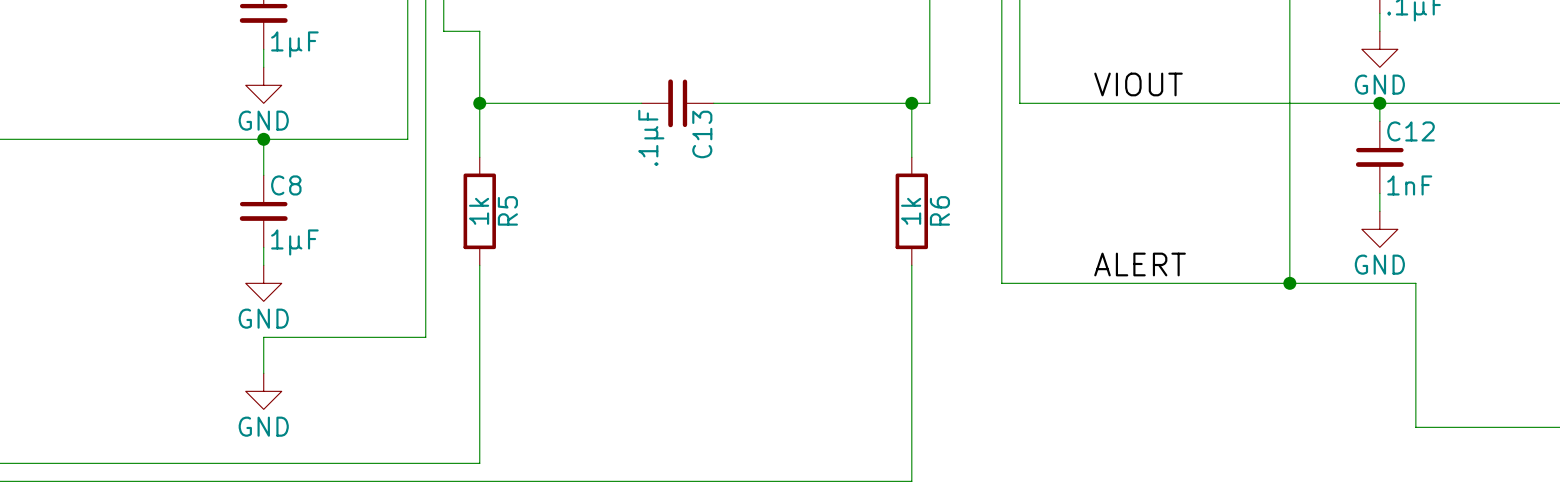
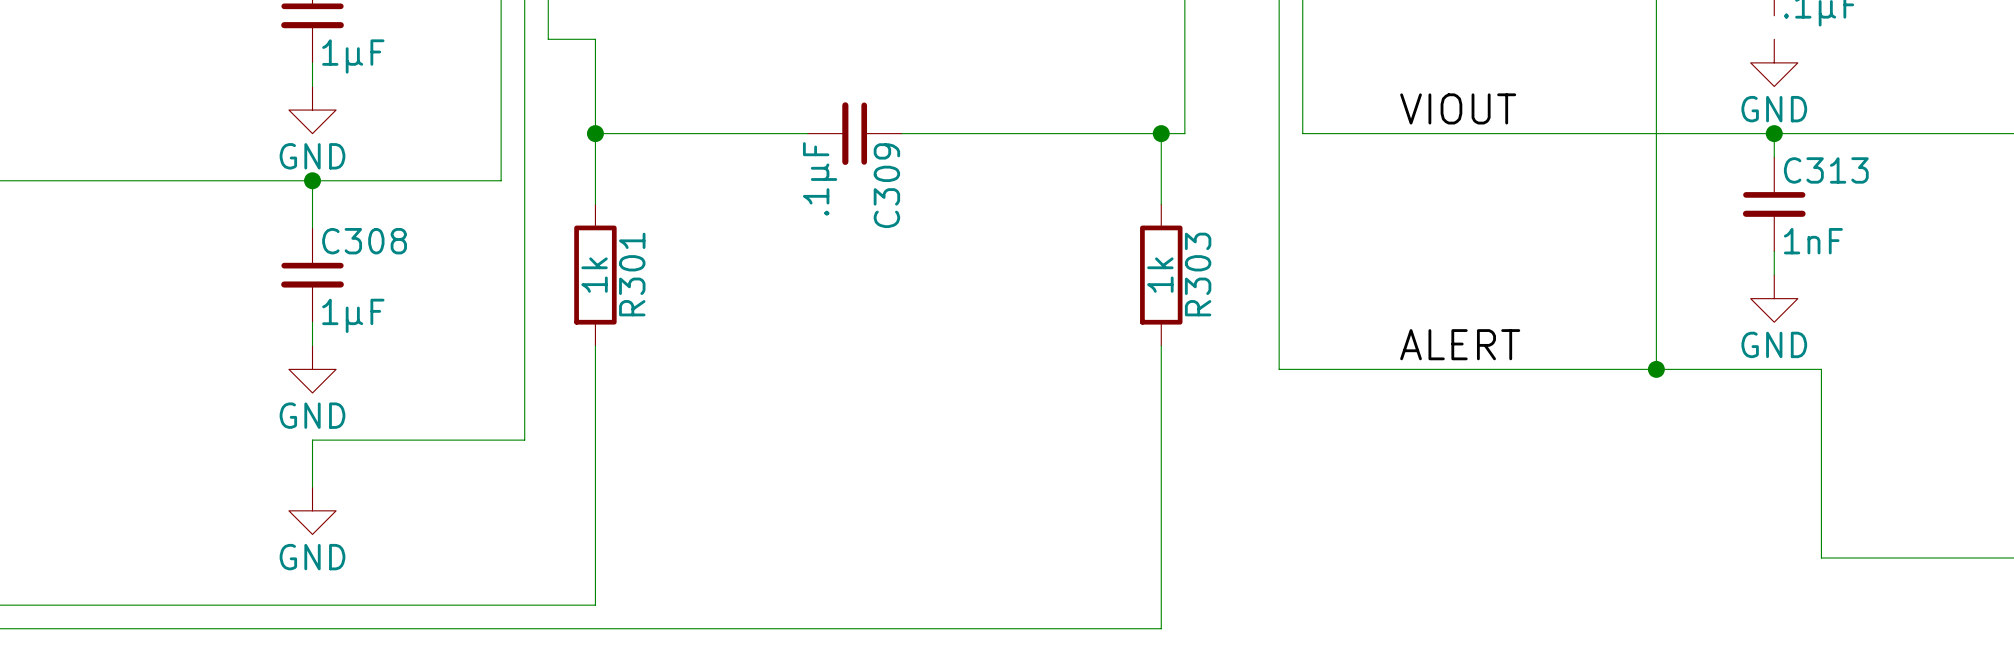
wire: (1379, 13) (1379, 31) -> none
C12 name: C12 (1411, 131) -> C313 (1826, 170)
C13 name: C13 (702, 134) -> C309 (886, 185)
C8 name: C8 (286, 185) -> C308 (364, 241)
R5 name: R5 (507, 210) -> R301 (632, 274)
R6 name: R6 (939, 210) -> R303 (1198, 274)

